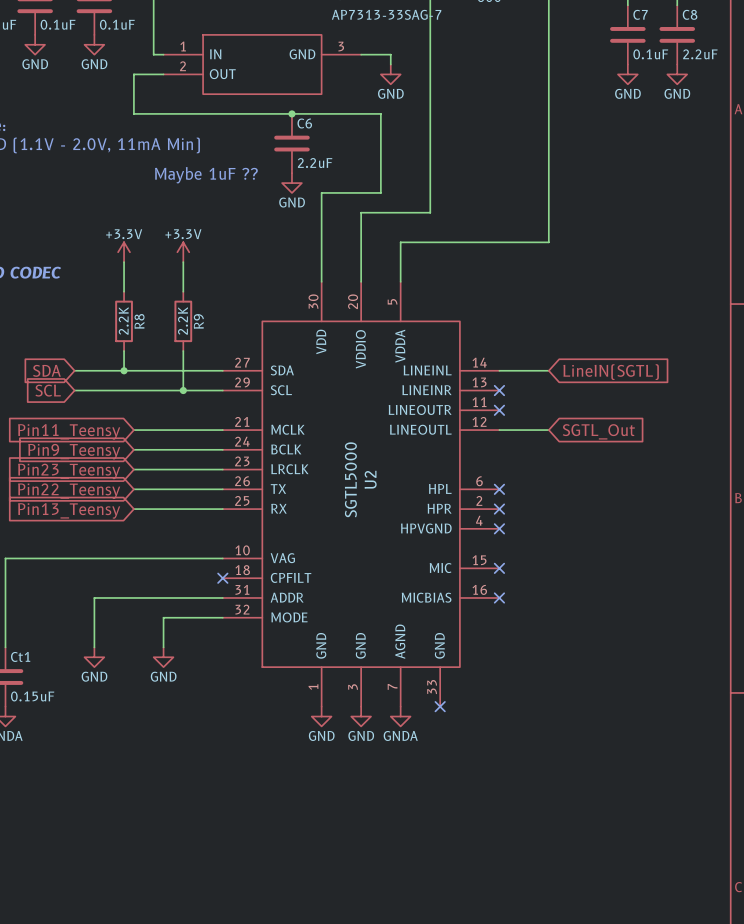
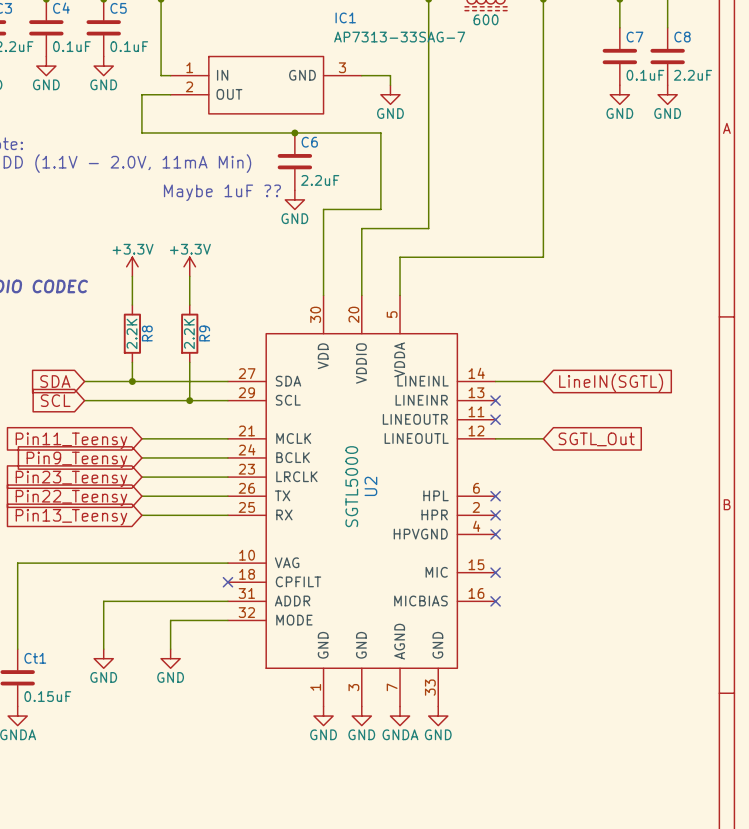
no-connect mark: (440, 706) -> none
power symbol: none -> GND (438, 716)

